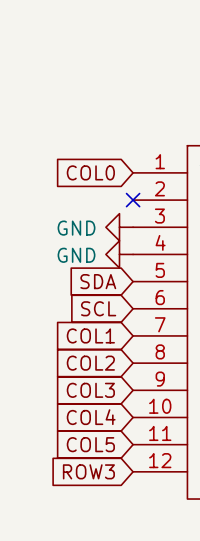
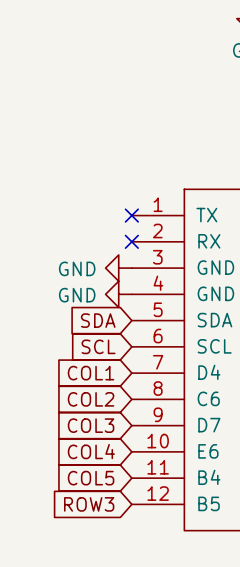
global label: COL0 (90, 172) -> none
no-connect mark: none -> (131, 215)

